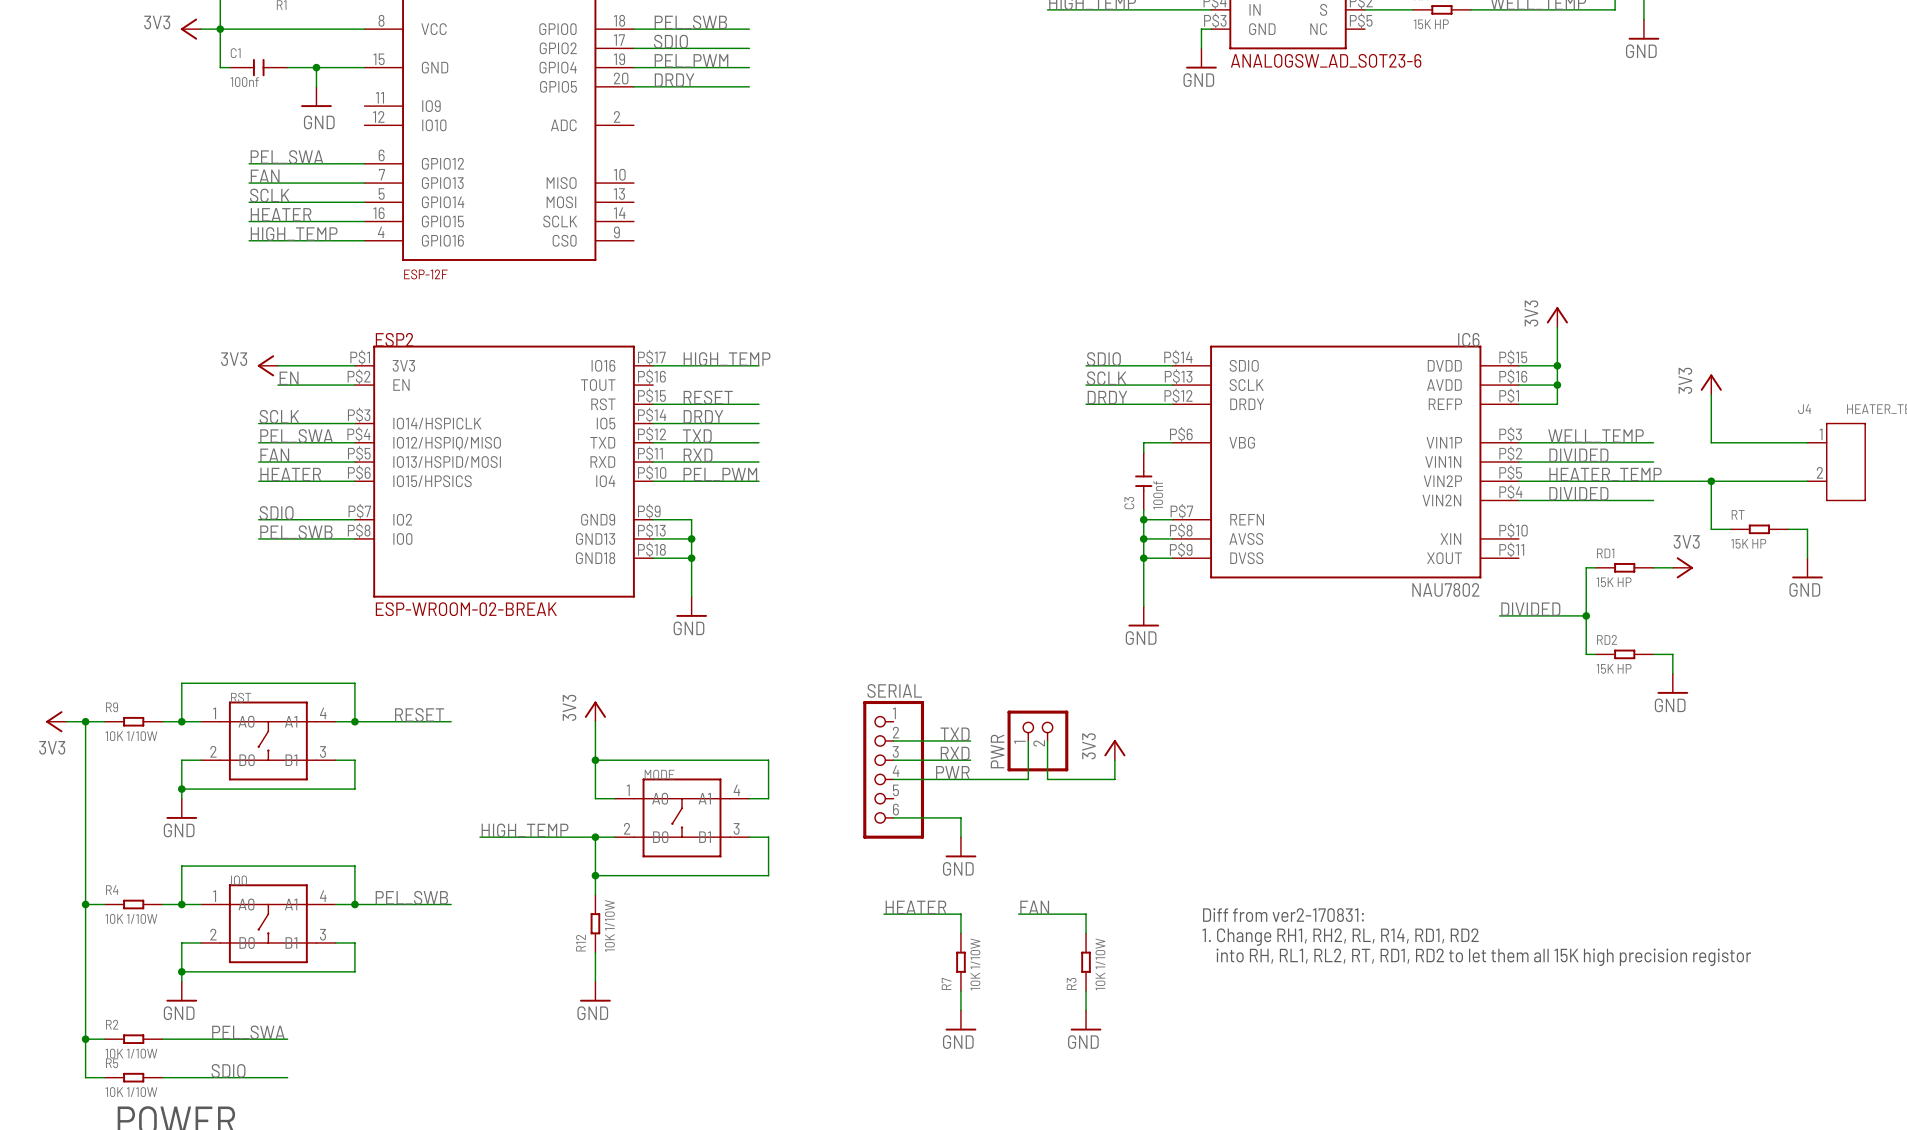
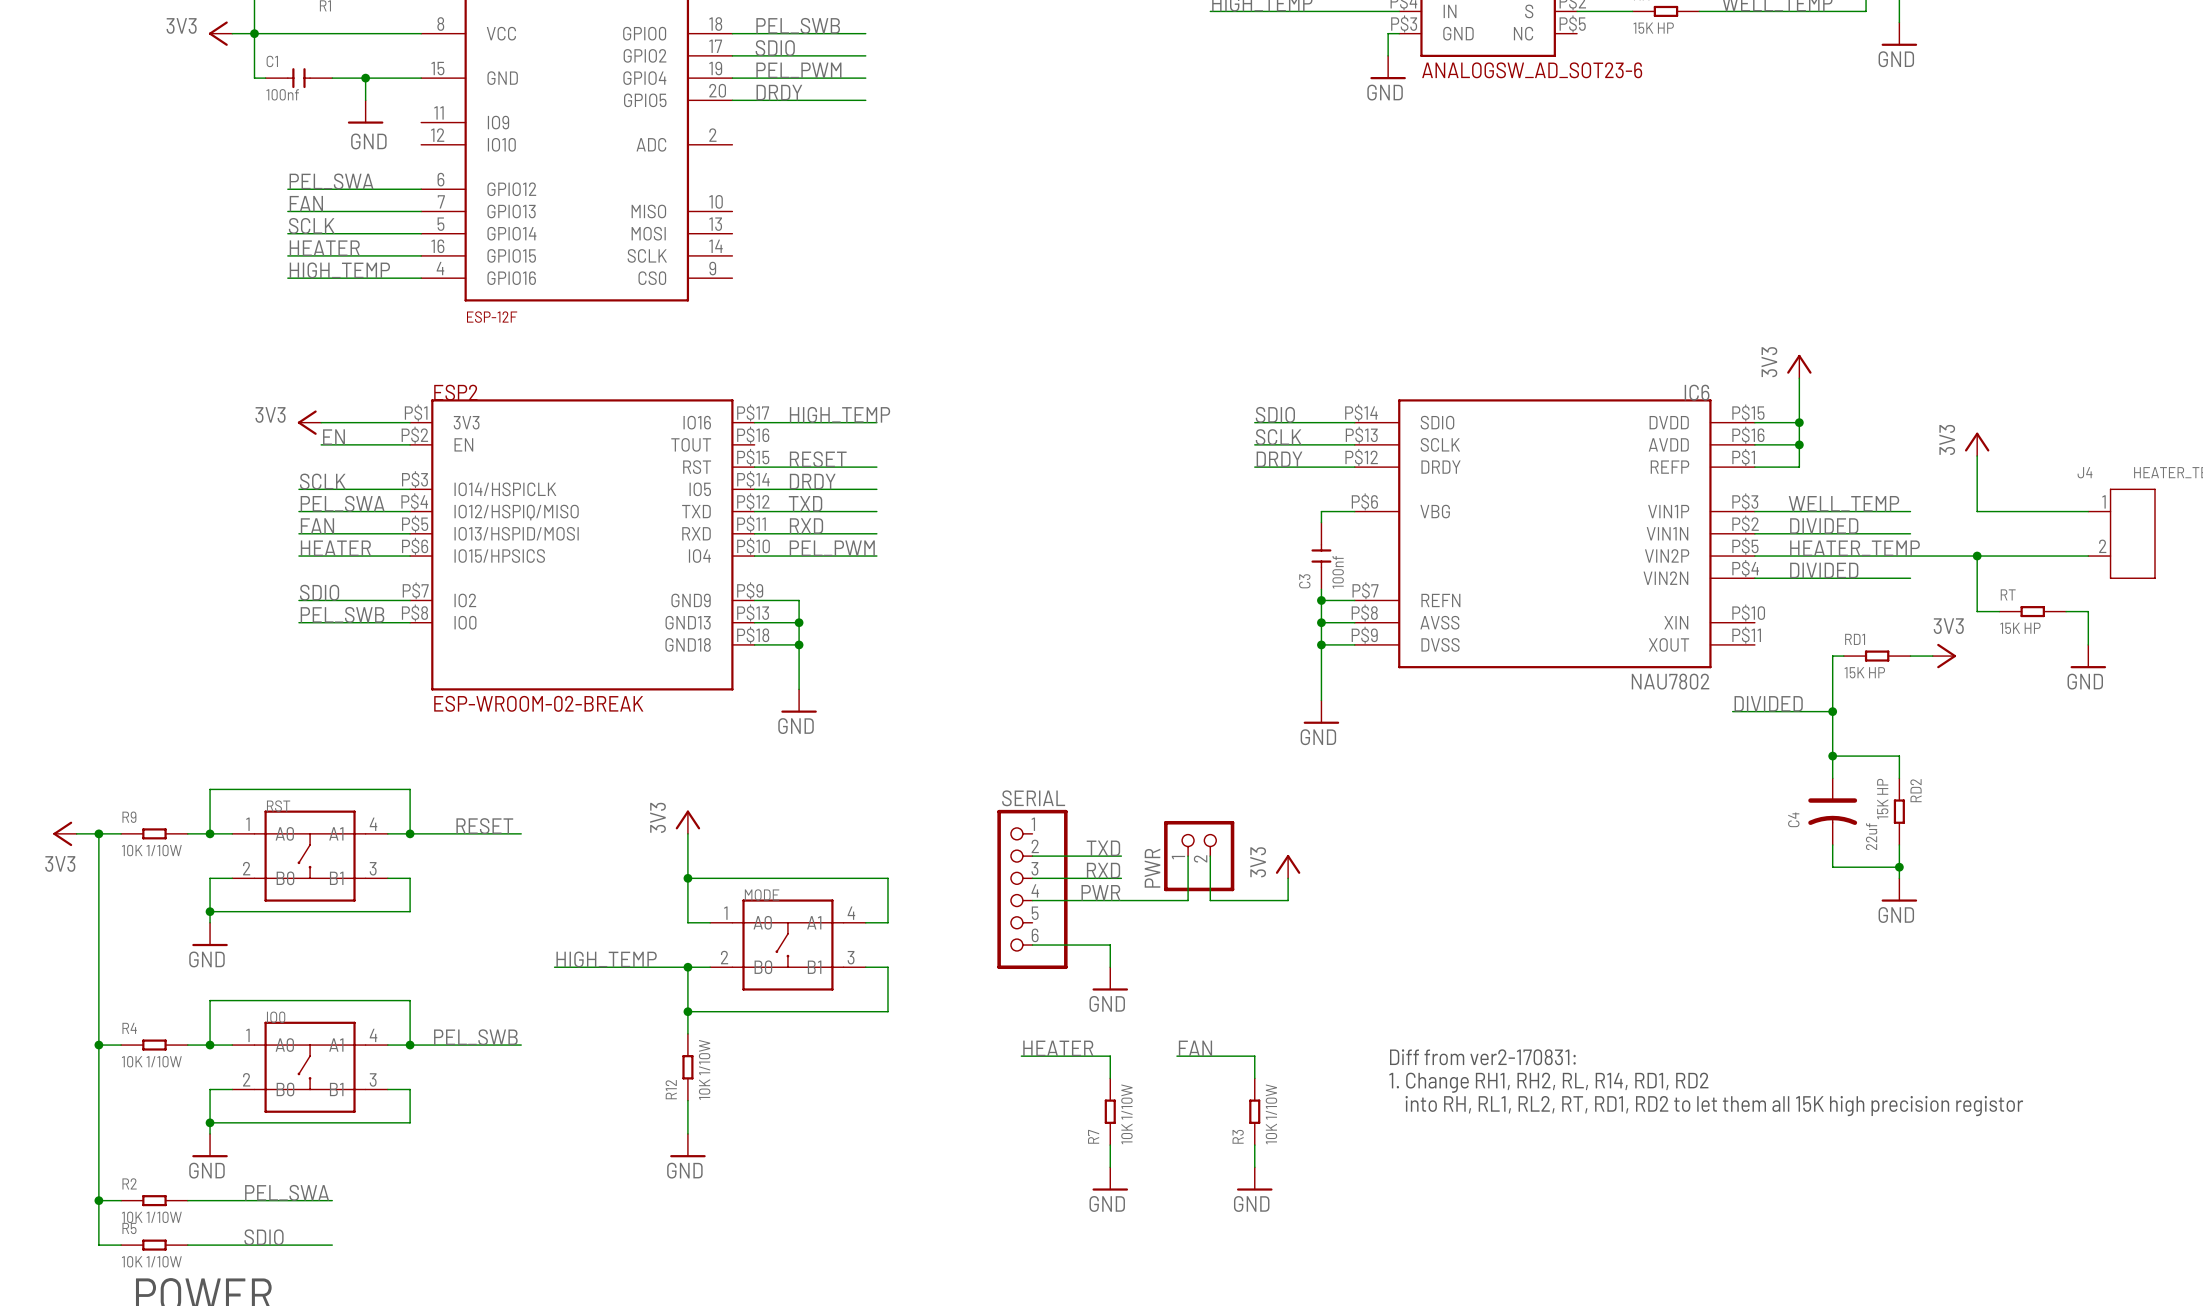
wire: none -> (1832, 756) (1832, 778)
junction: none -> (1832, 756)
wire: none -> (1843, 756) (1899, 756) (1899, 778)
RD2 rotation: 0° (1624, 654) -> 90° clockwise (1899, 811)
RD2 position: (1624, 654) -> (1899, 811)
wire: (1653, 654) (1672, 654) (1672, 673) -> none
power symbol position: GND (1672, 683) -> GND (1899, 890)
C4: none -> 22uf (1832, 811)
wire: none -> (1832, 844) (1832, 867) (1899, 867)
wire: none -> (1899, 844) (1899, 878)
junction: none -> (1899, 867)

